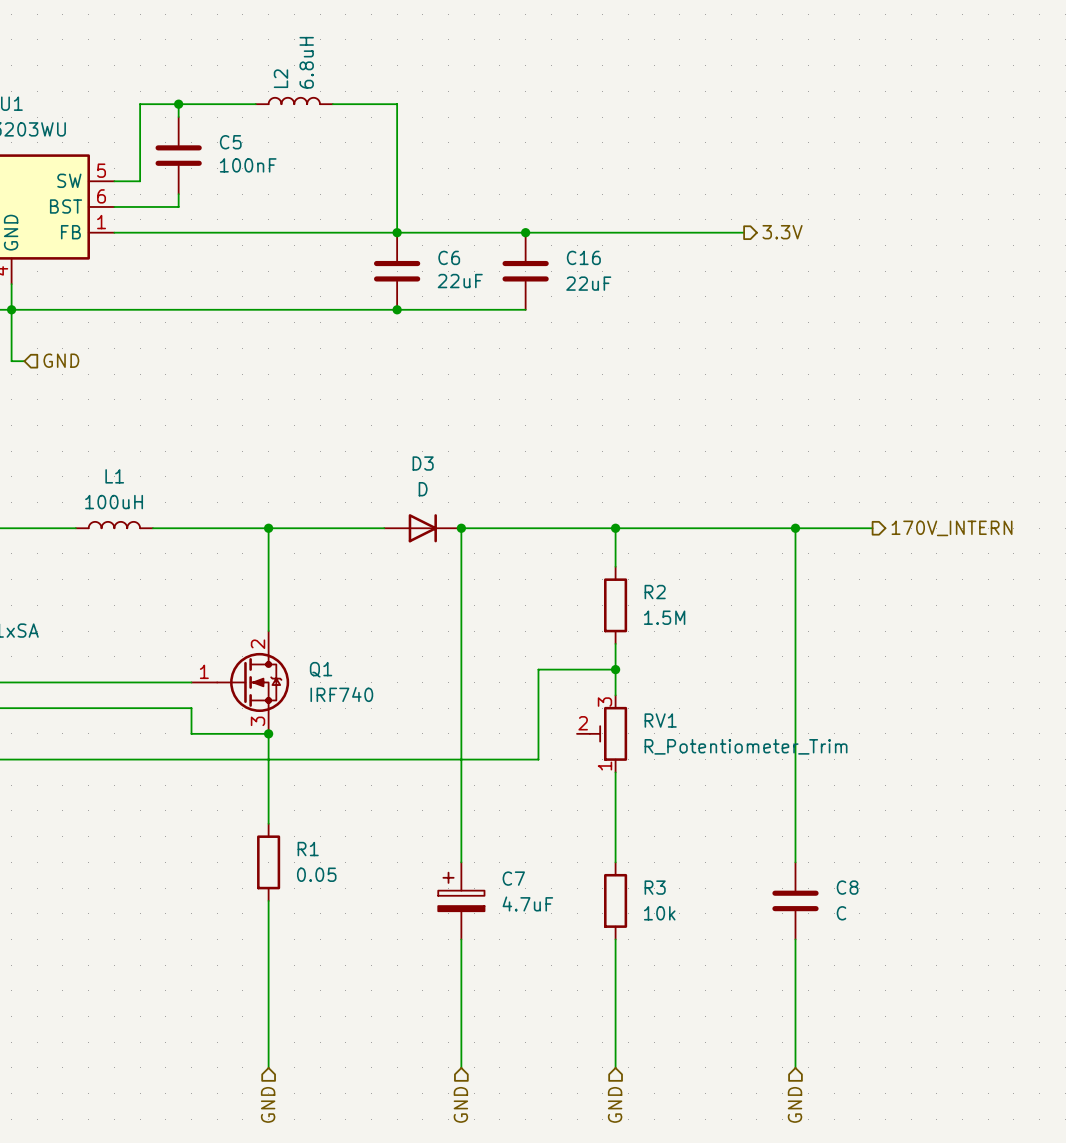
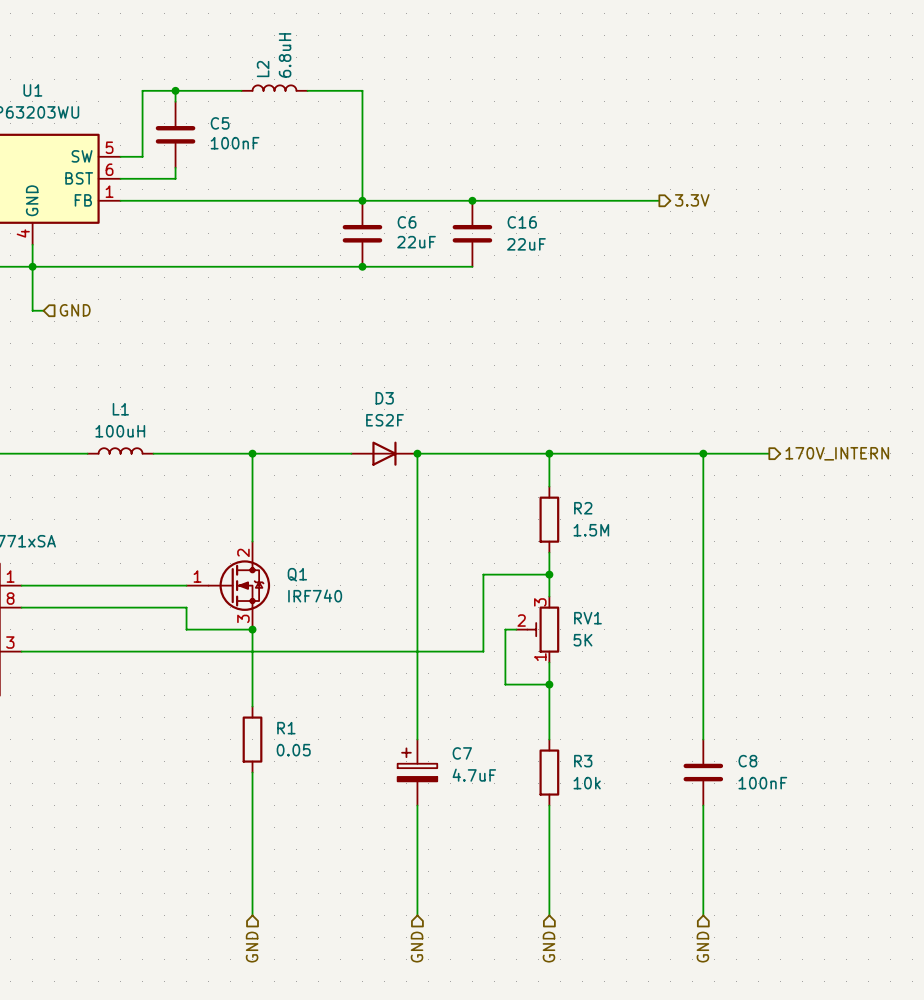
D3 value: D (423, 489) -> ES2F (384, 420)
wire: none -> (516, 629) (505, 629) (505, 684) (549, 684)
RV1 value: R_Potentiometer_Trim (746, 746) -> 5K (582, 640)
junction: none -> (549, 684)
C8 value: C (841, 913) -> 100nF (762, 783)

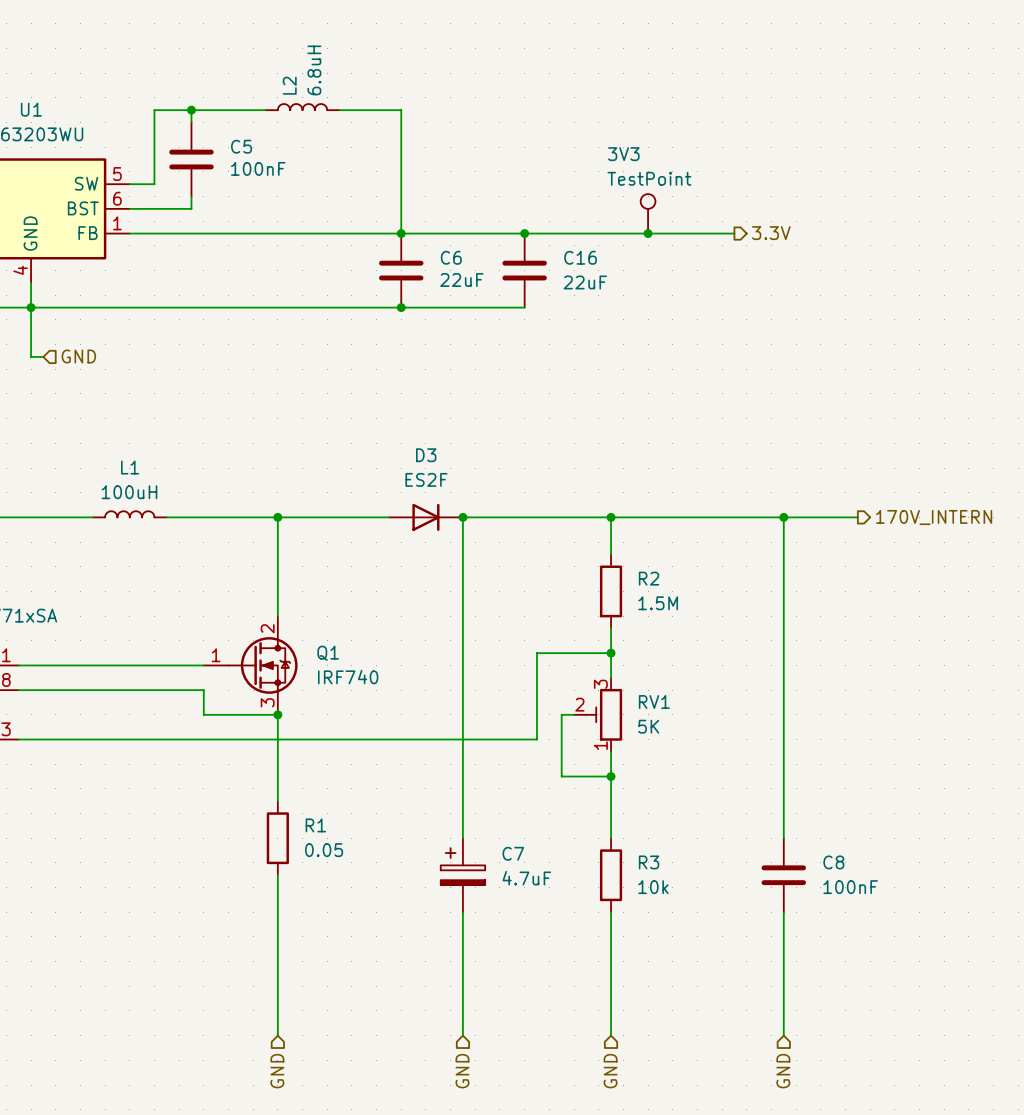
3V3: none -> TestPoint (648, 213)
junction: none -> (648, 233)

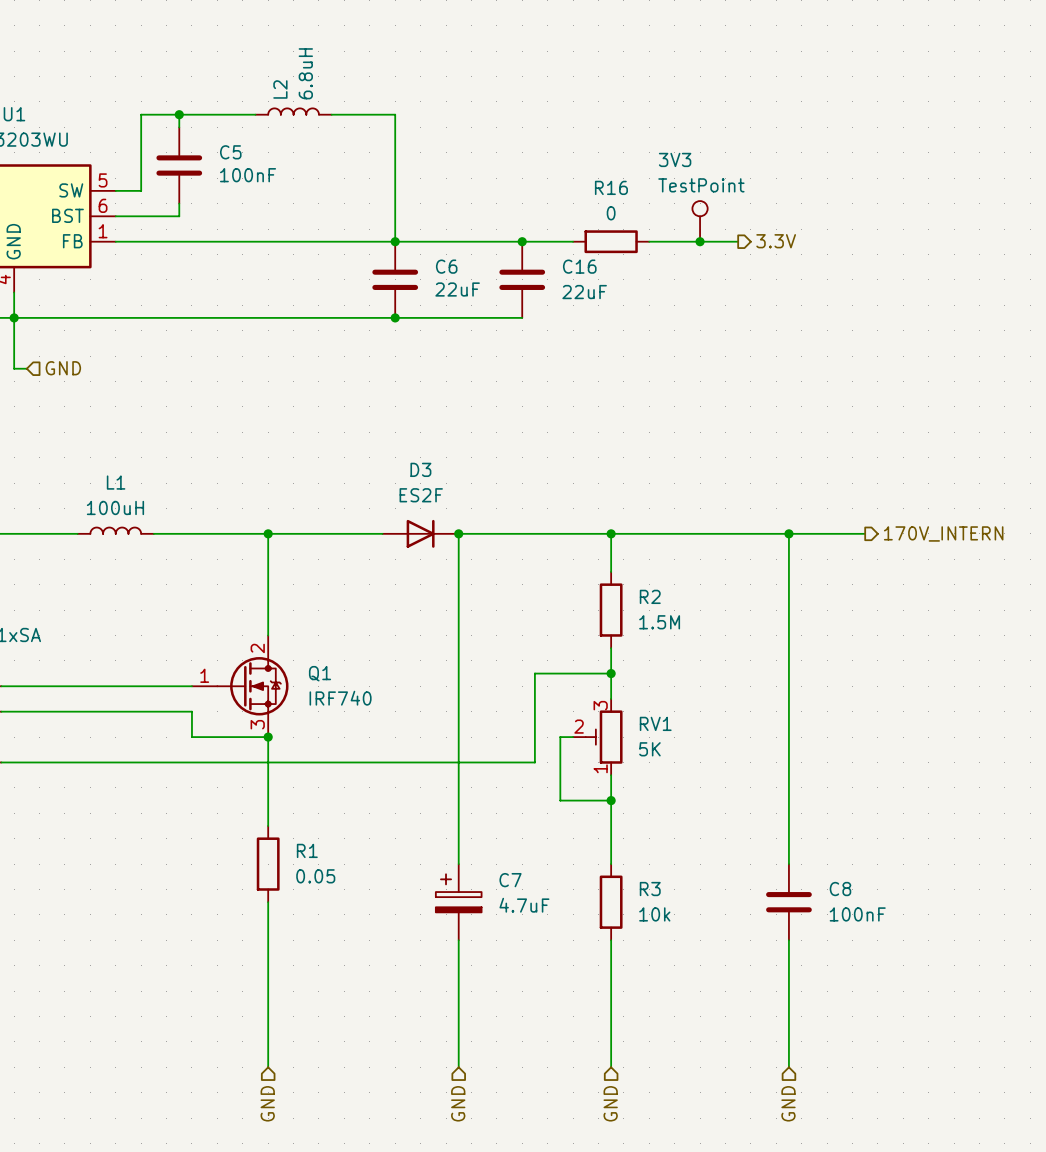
3V3 position: (648, 213) -> (700, 221)
wire: (574, 233) (648, 233) -> none
R16: none -> 0 (611, 241)
junction position: (648, 233) -> (700, 241)

